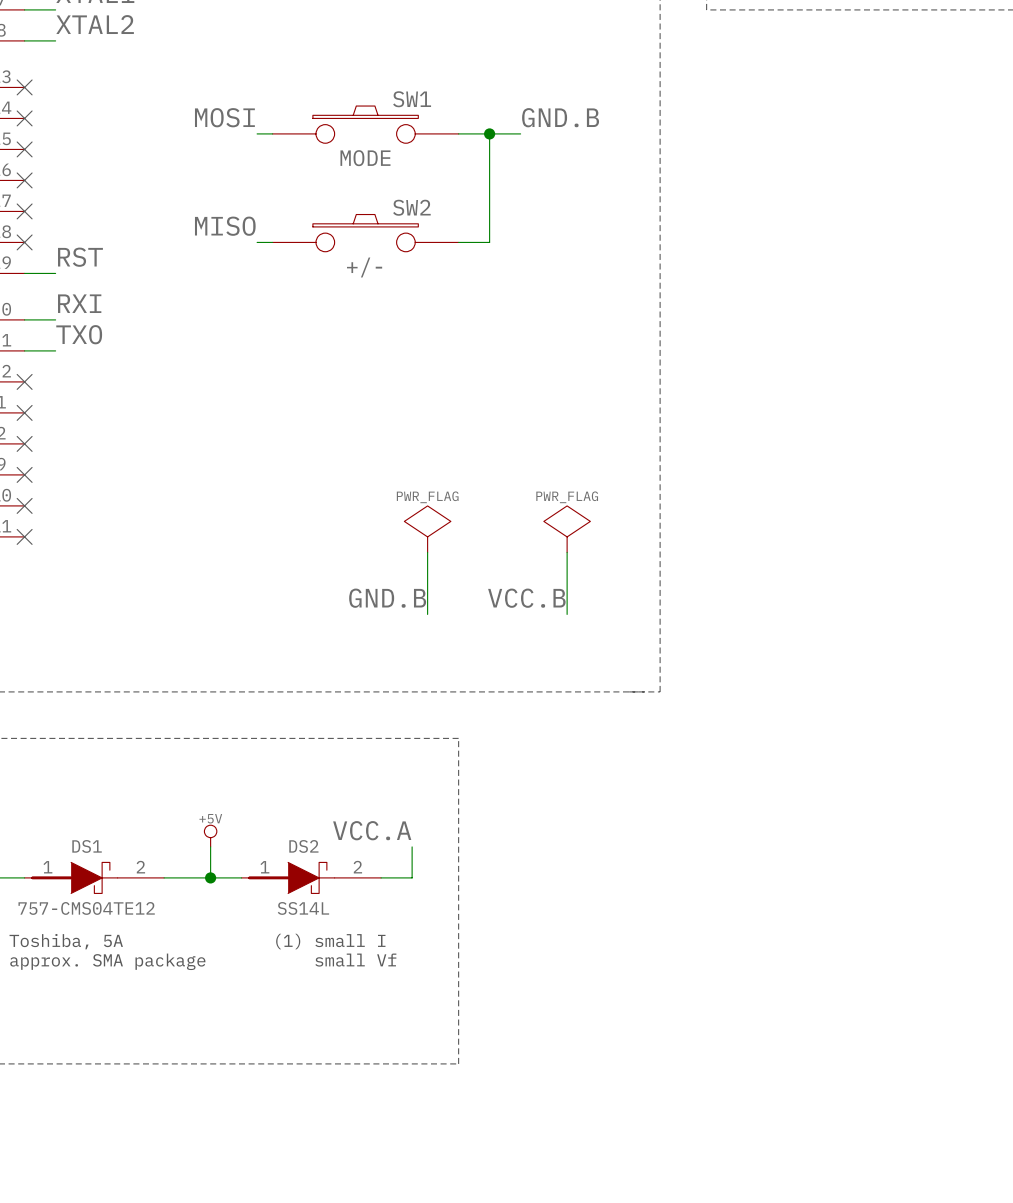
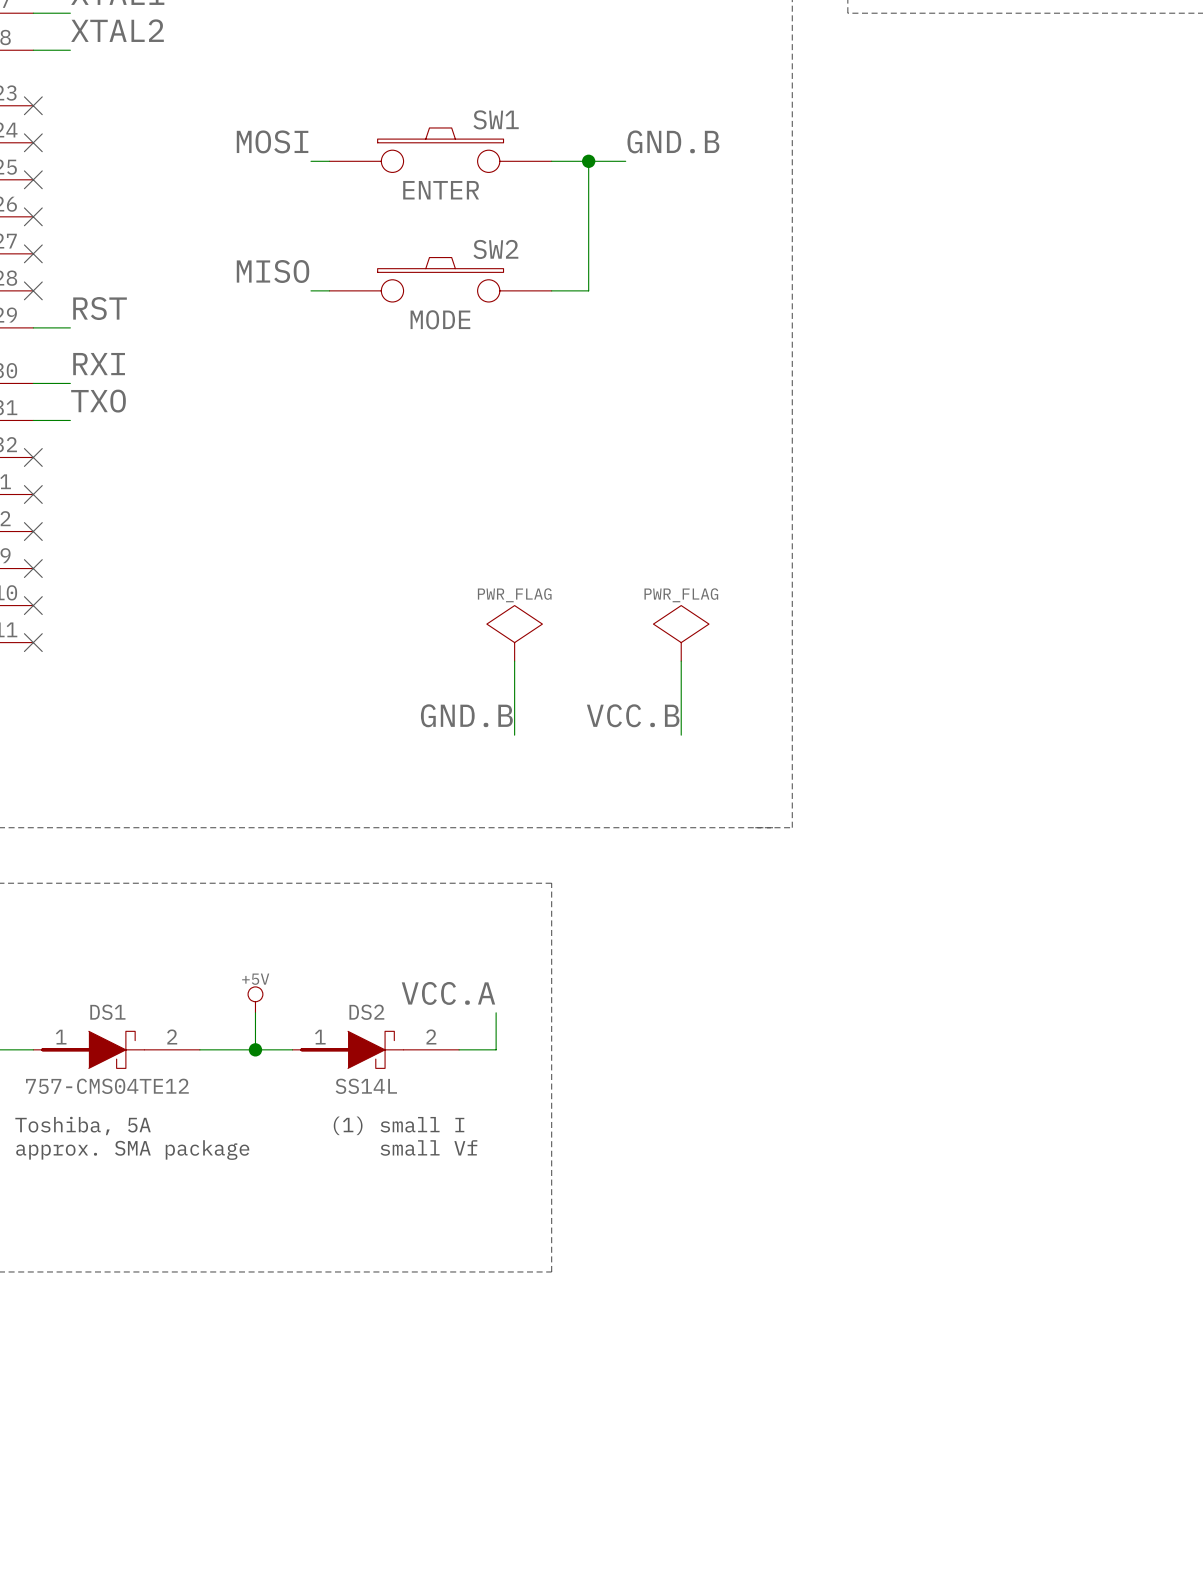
SW1 value: MODE (365, 158) -> ENTER (441, 190)
SW2 value: +/- (364, 267) -> MODE (440, 319)

